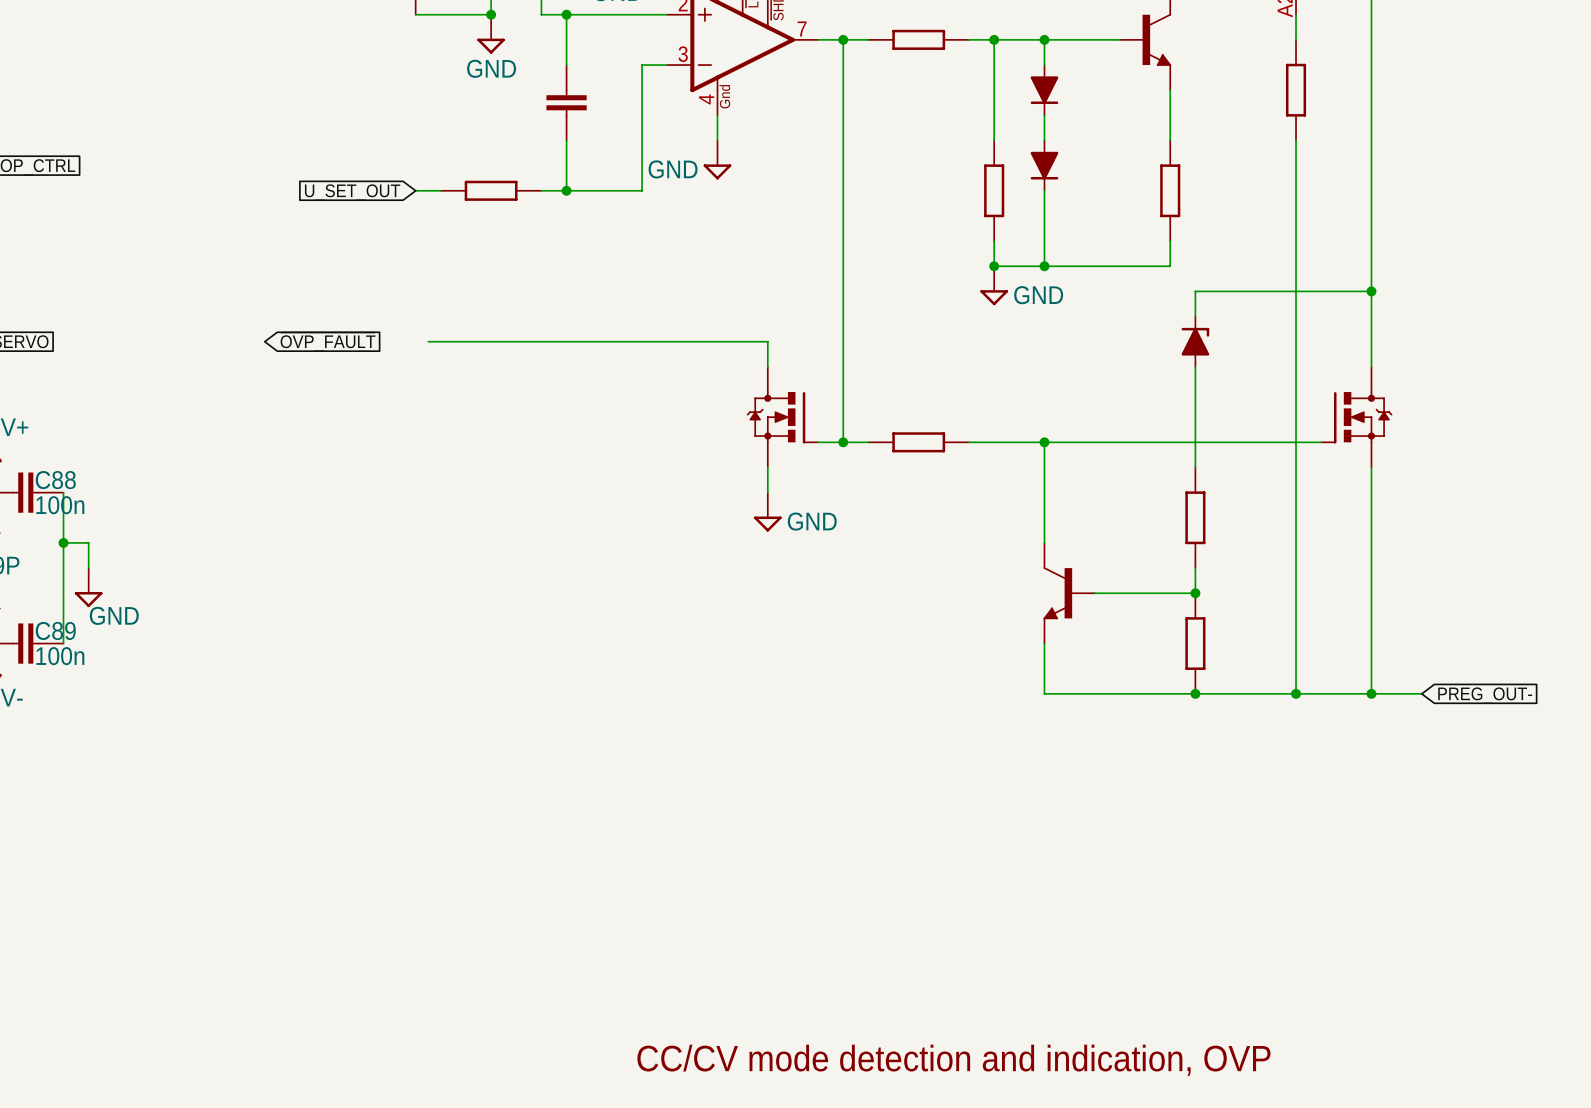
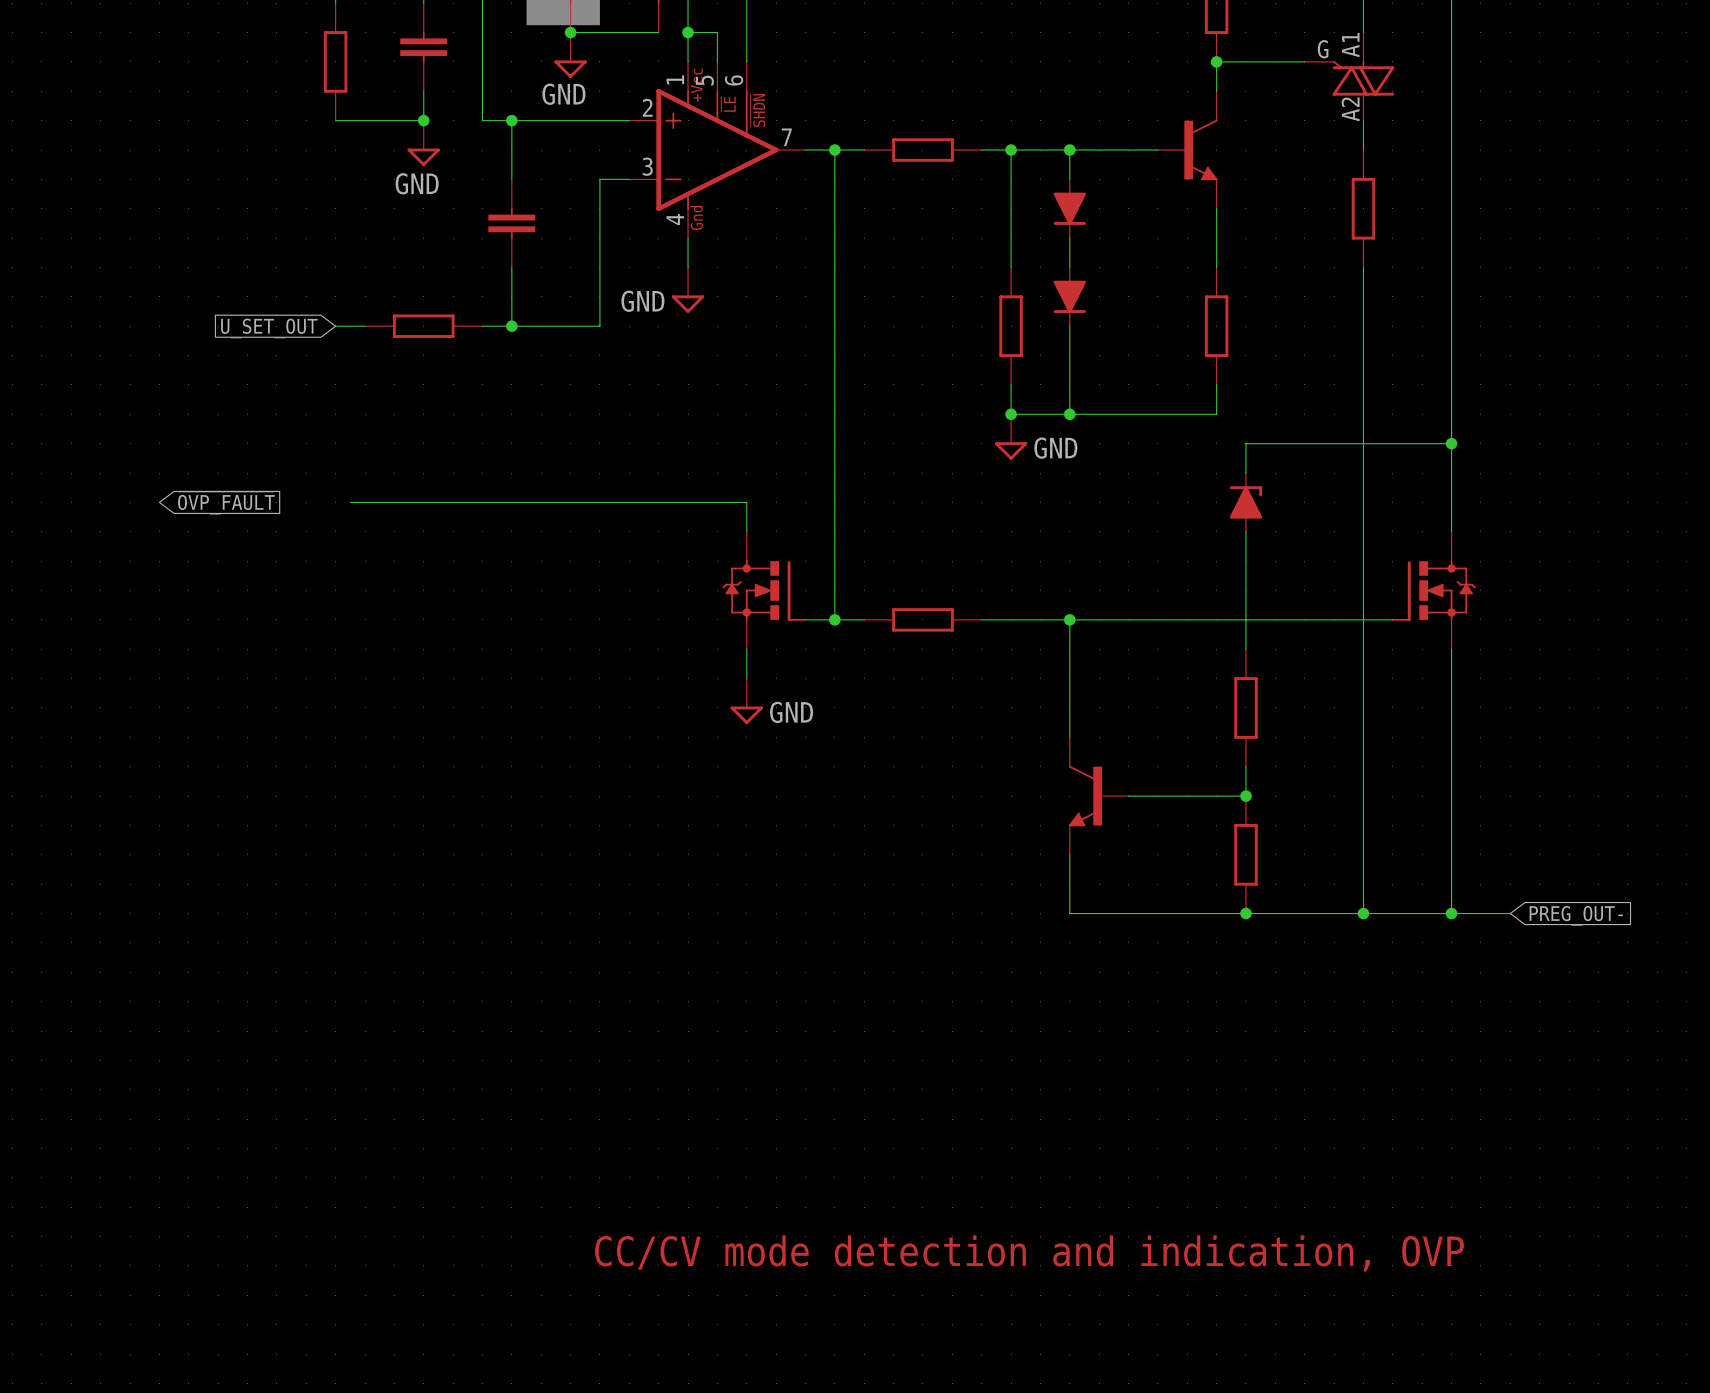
text position: CC/CV mode detection and indication, OVP (953, 1060) -> CC/CV mode detection and indication, OVP (1029, 1253)

